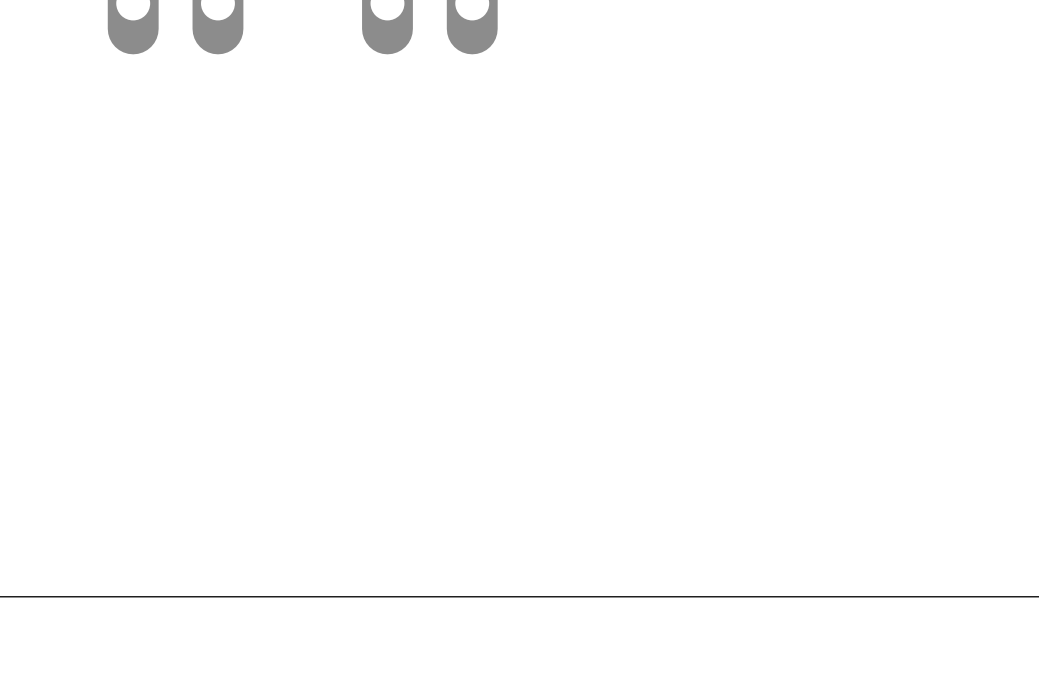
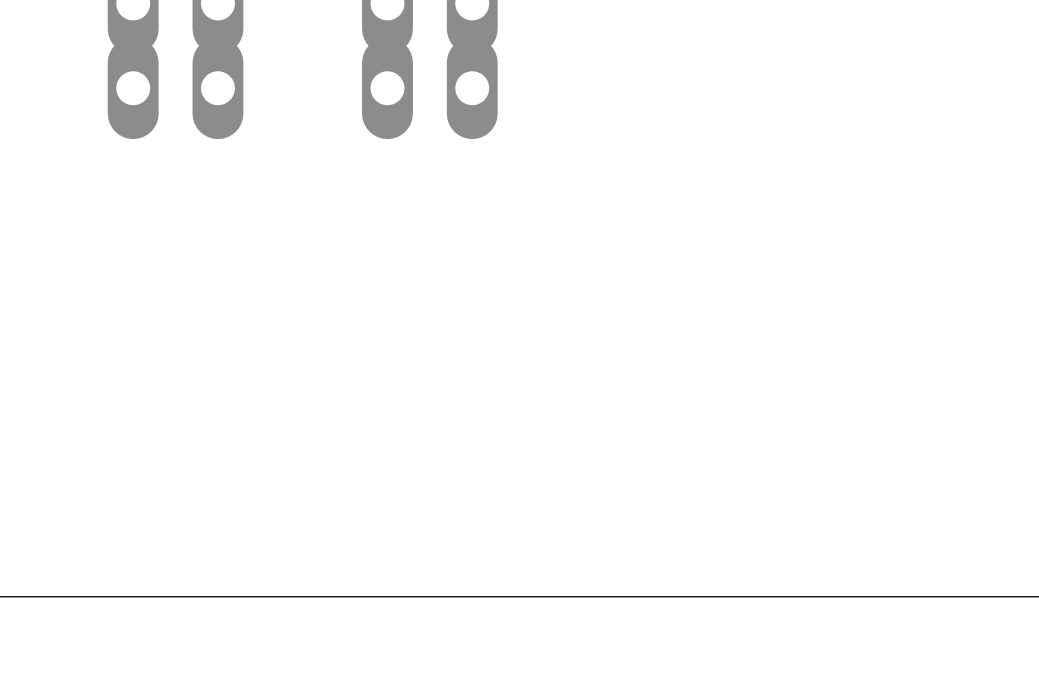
part: none -> (175, 88)
part: none -> (429, 88)

